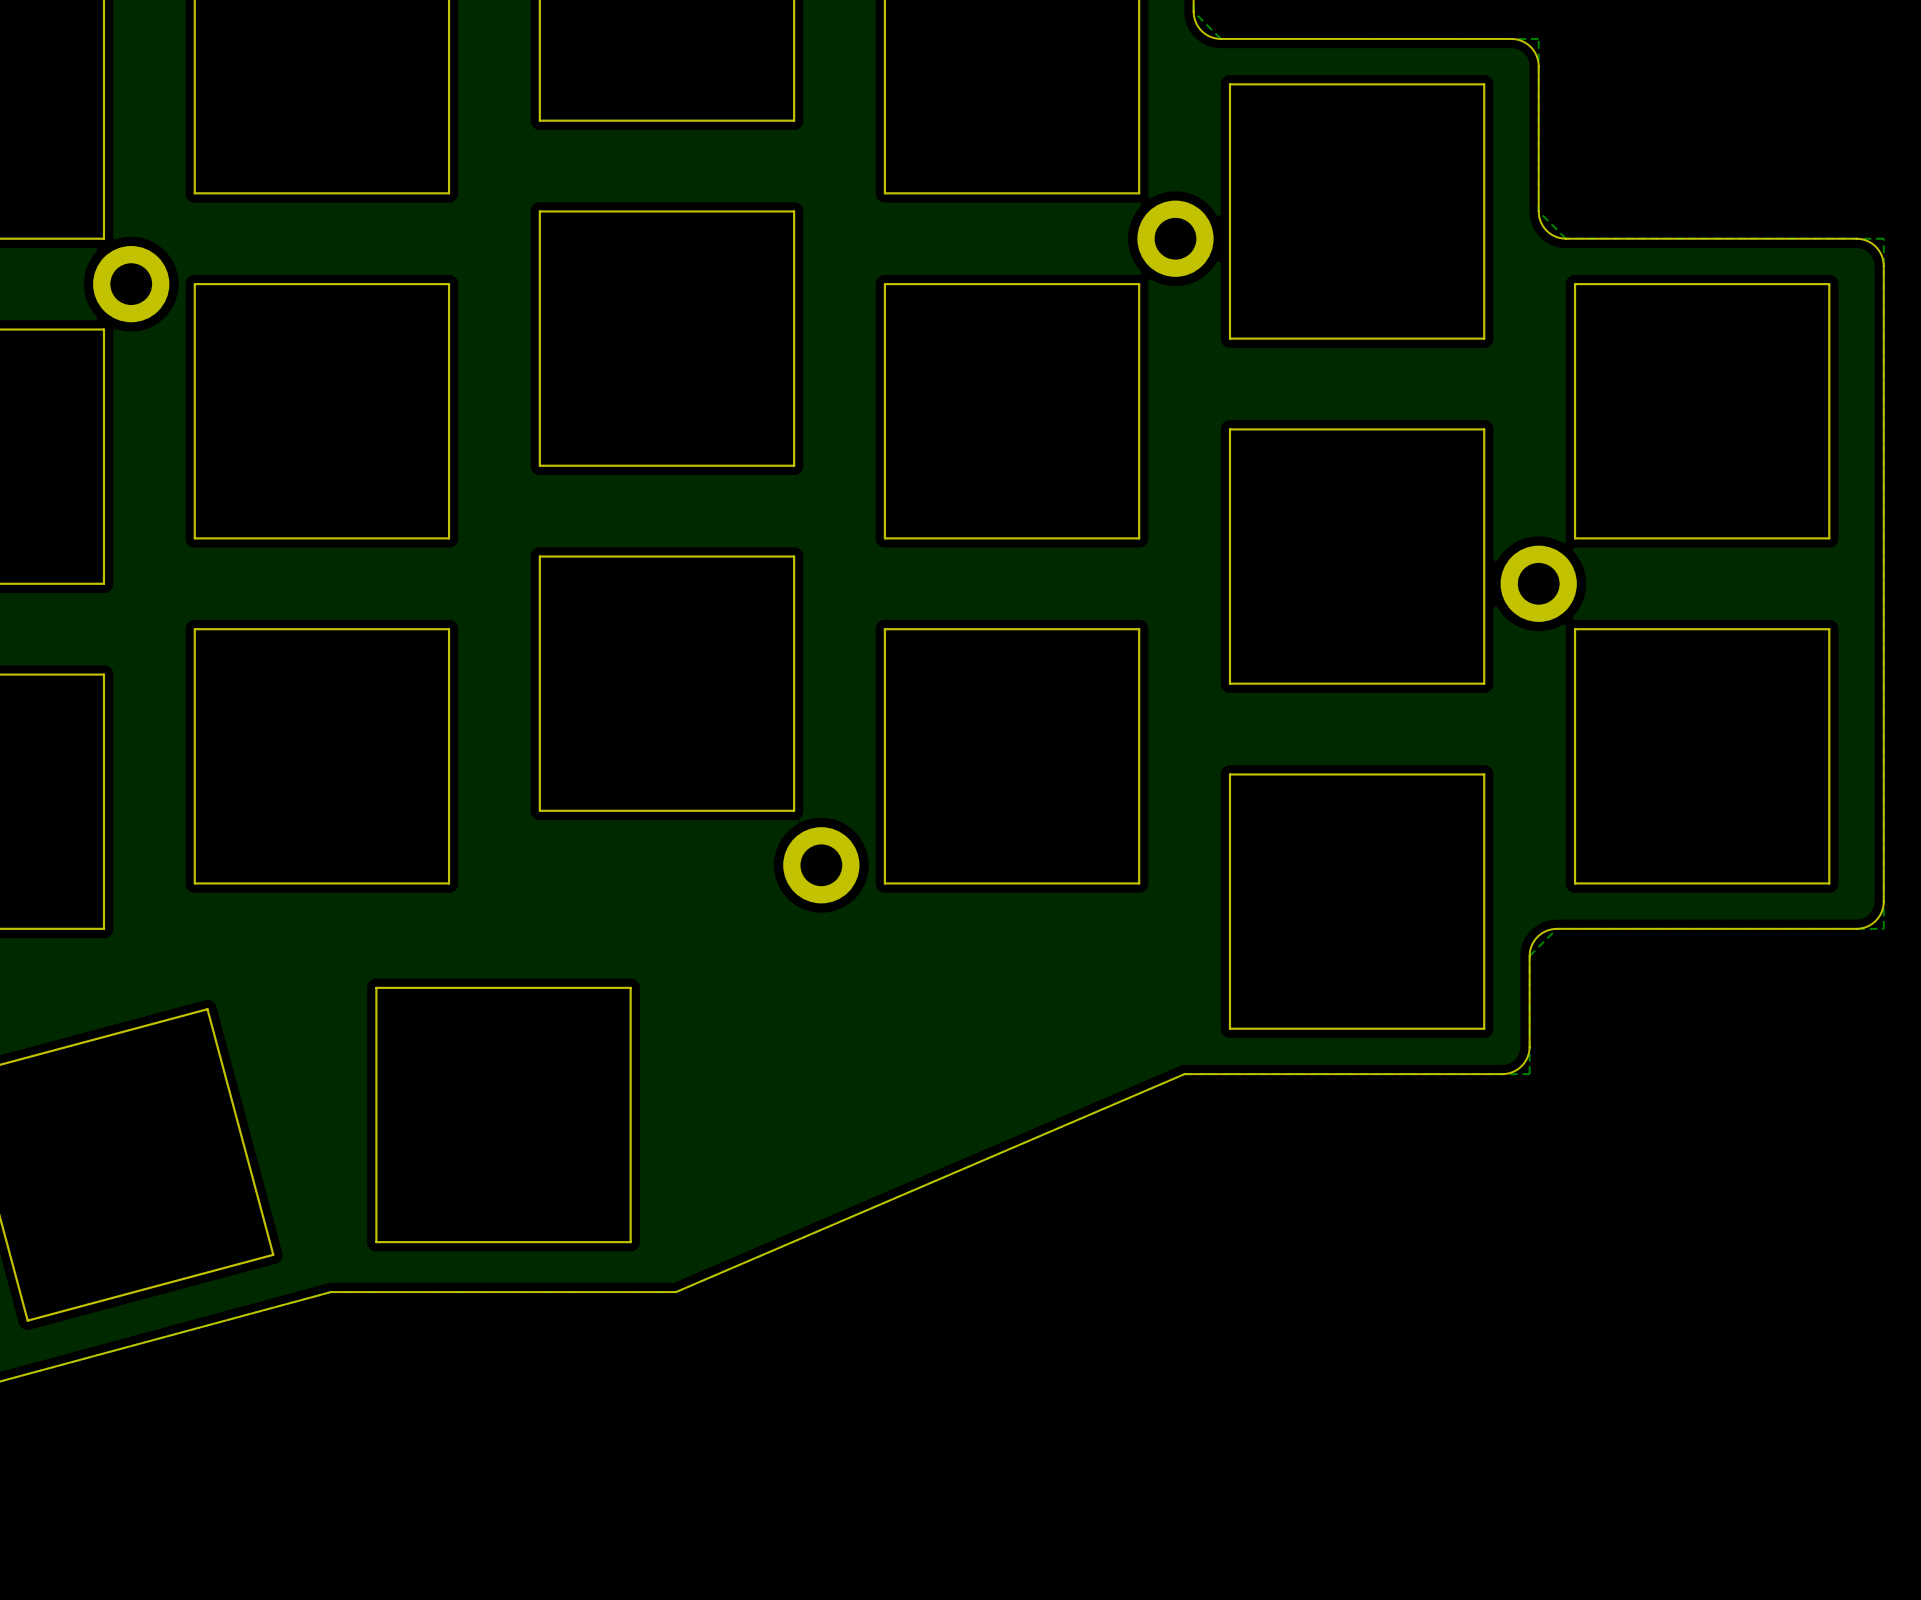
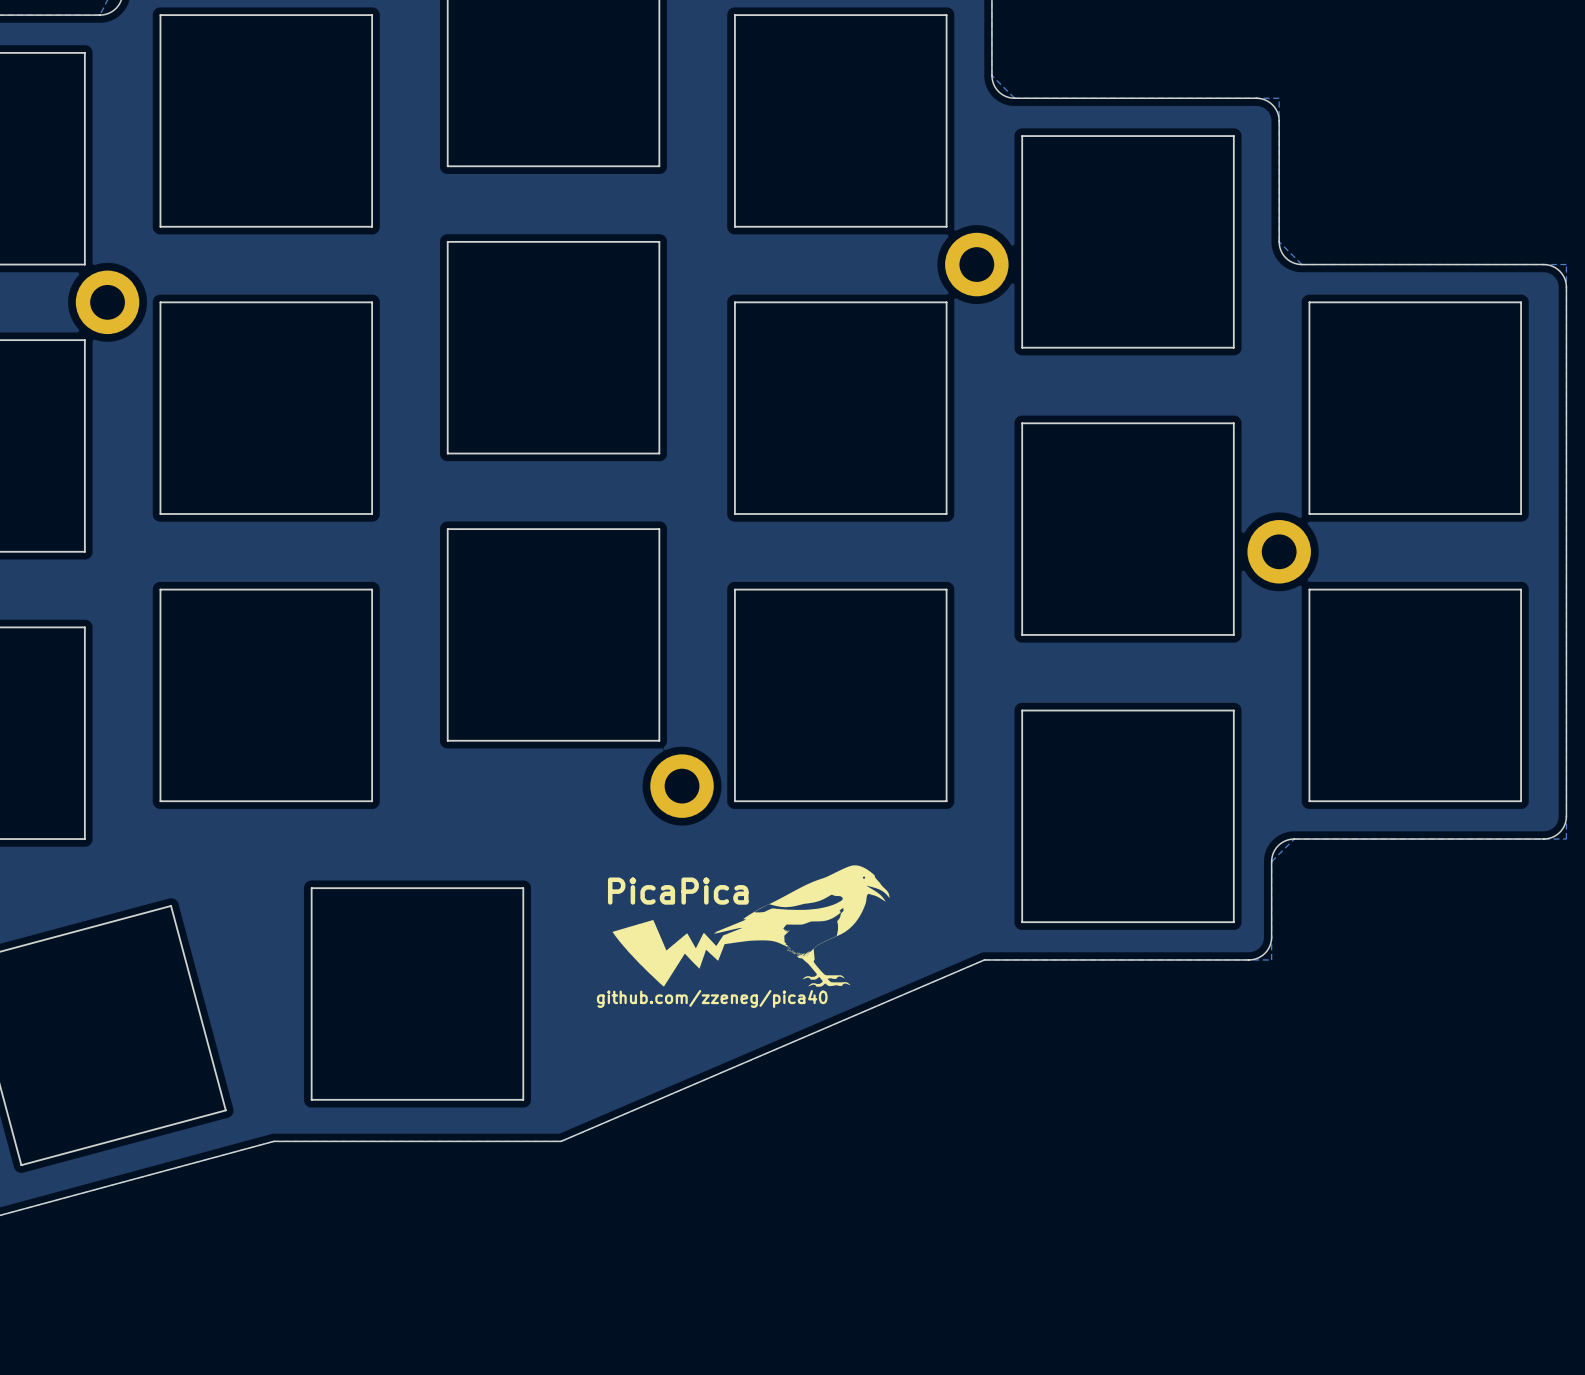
drawing: none -> [612, 865, 890, 987]
text: none -> PicaPica (678, 891)
text: none -> github.com/zzeneg/pica40 (712, 998)

